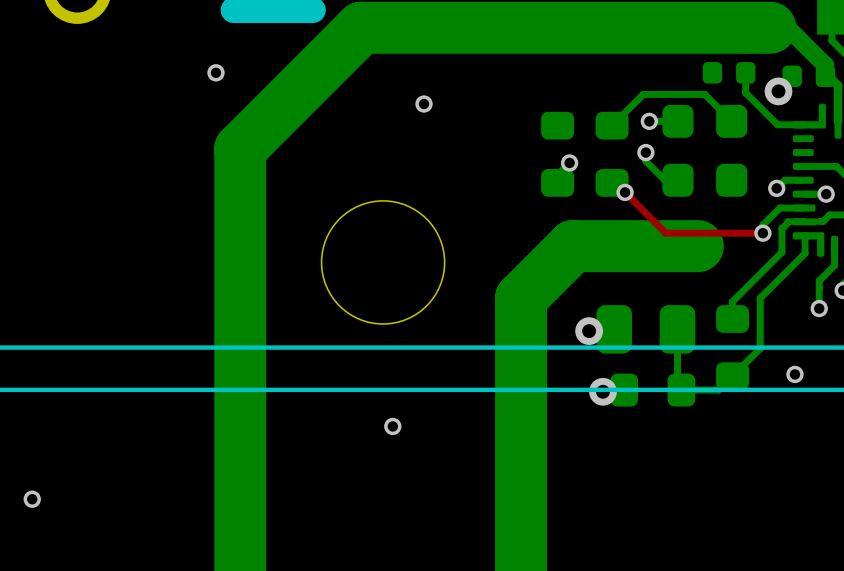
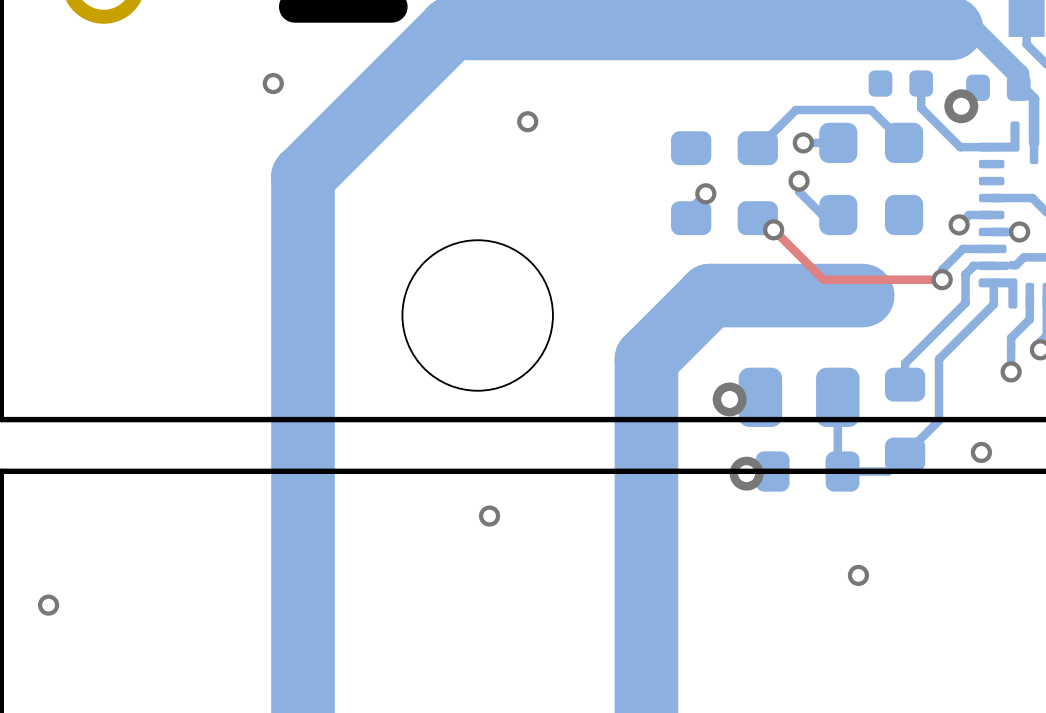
via: none -> (858, 575)

